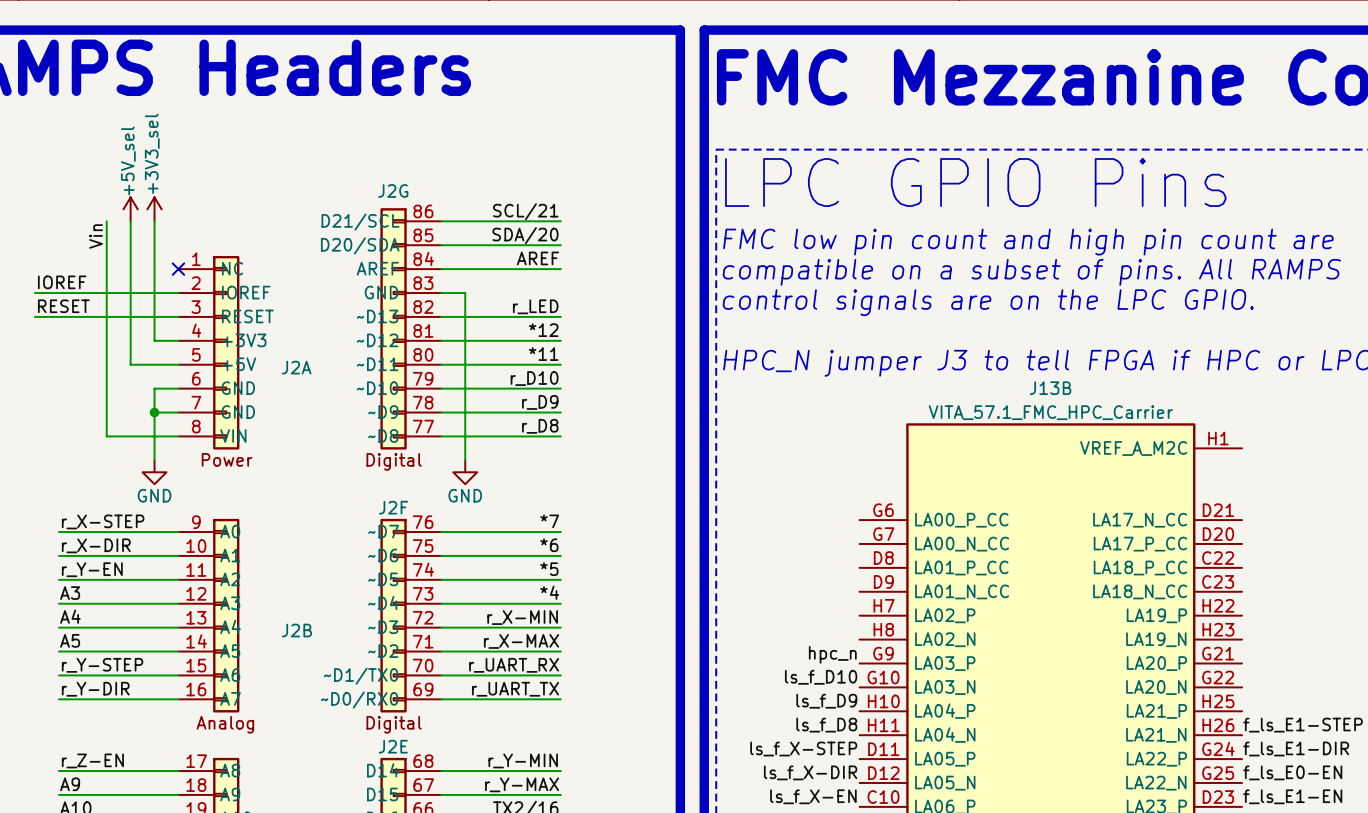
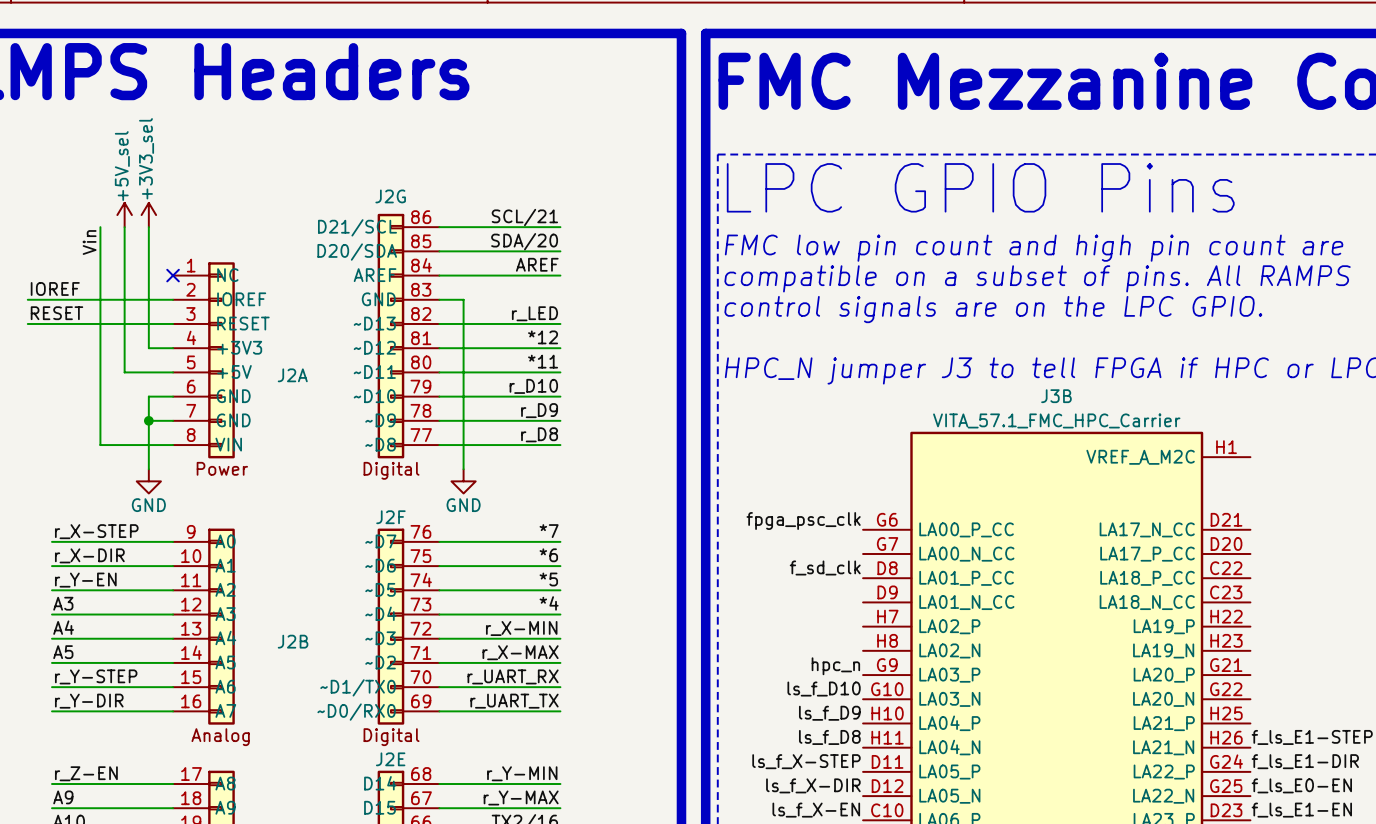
J13B name: J13B (1050, 388) -> J3B (1056, 396)
label: none -> fpga_psc_clk (803, 521)
label: none -> f_sd_clk (825, 567)

